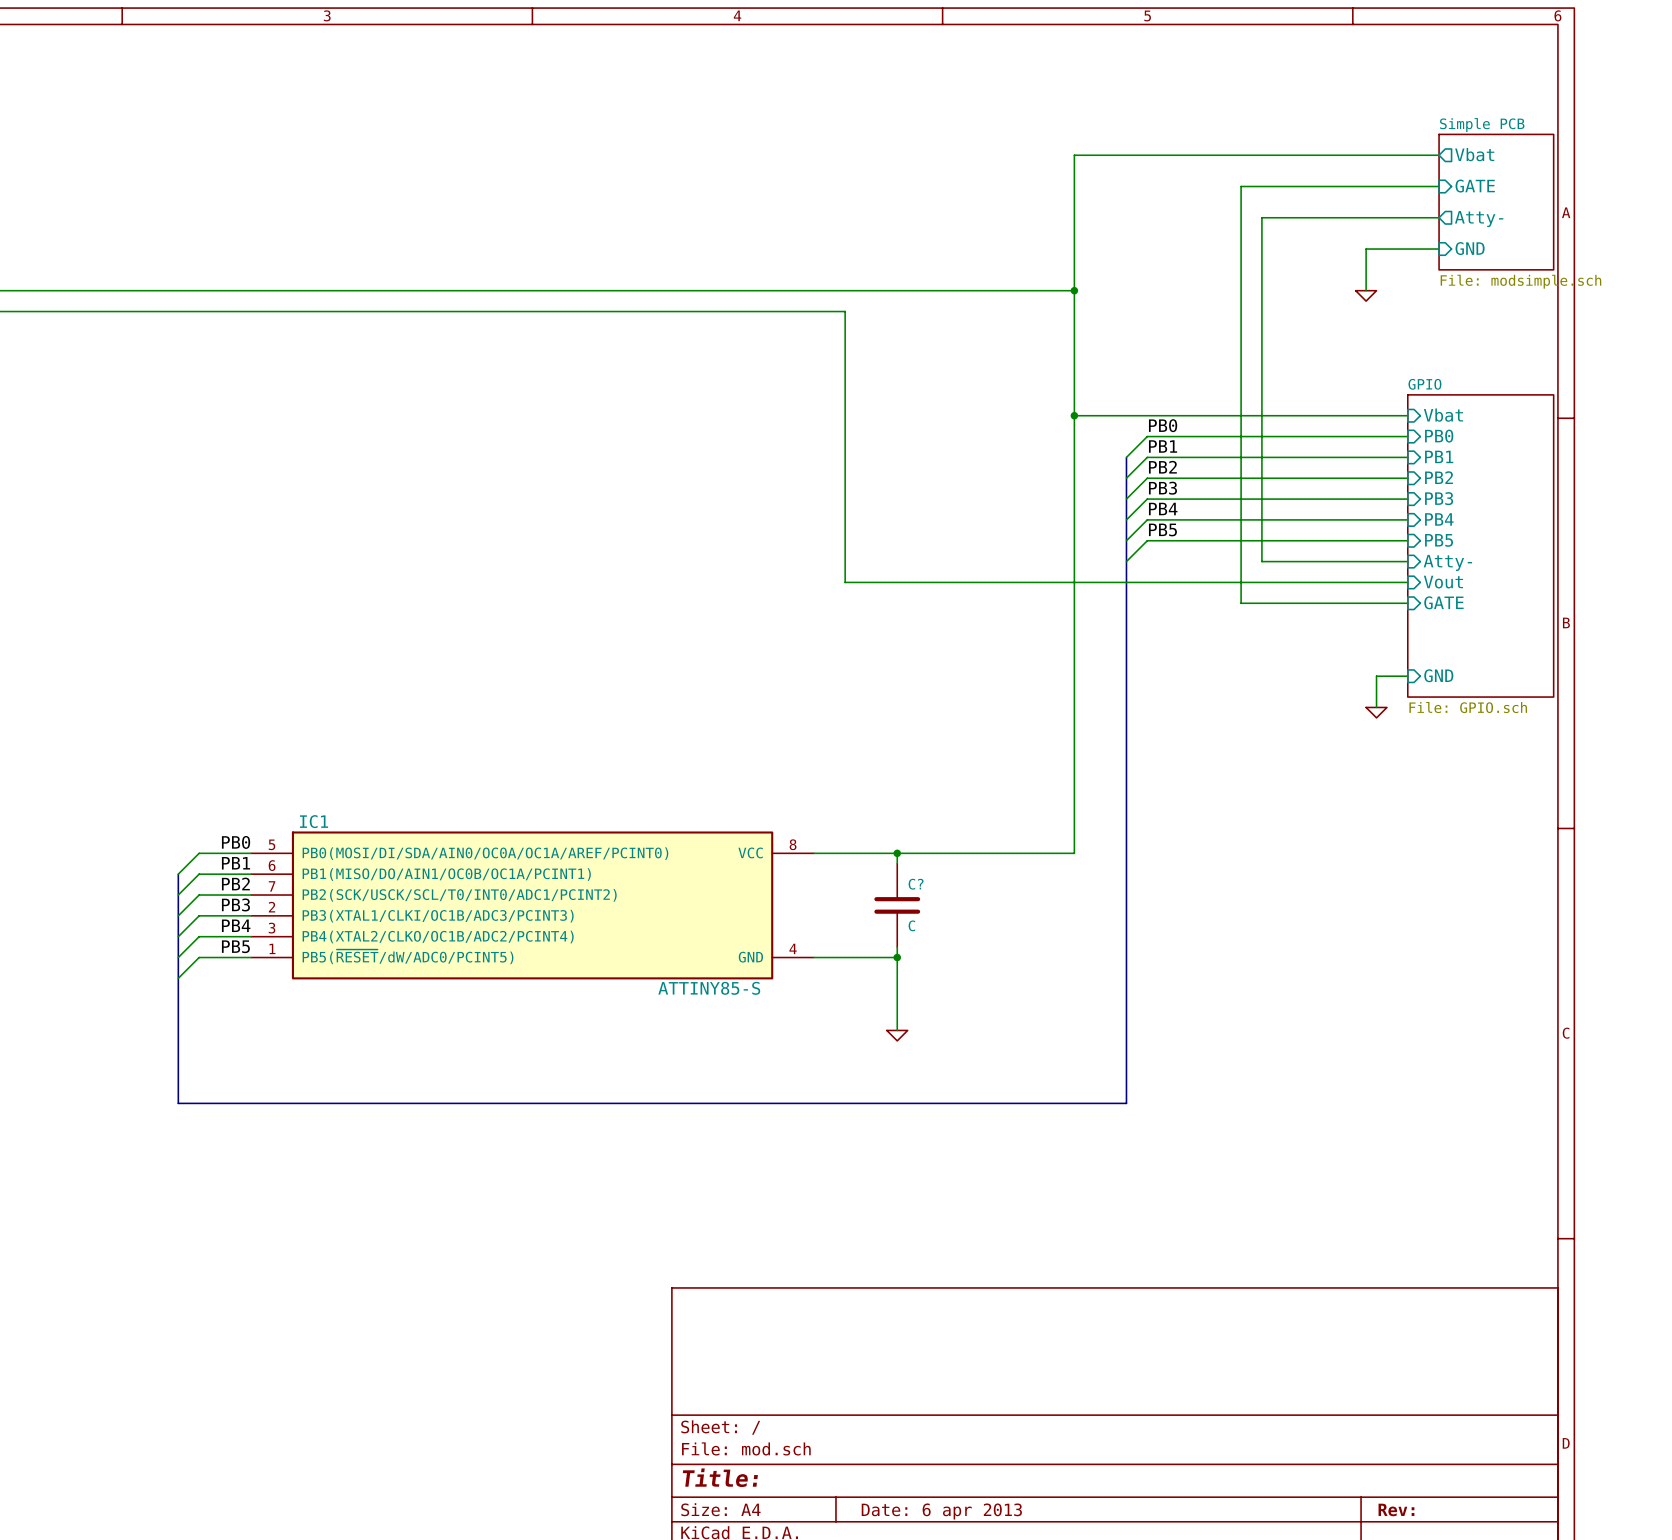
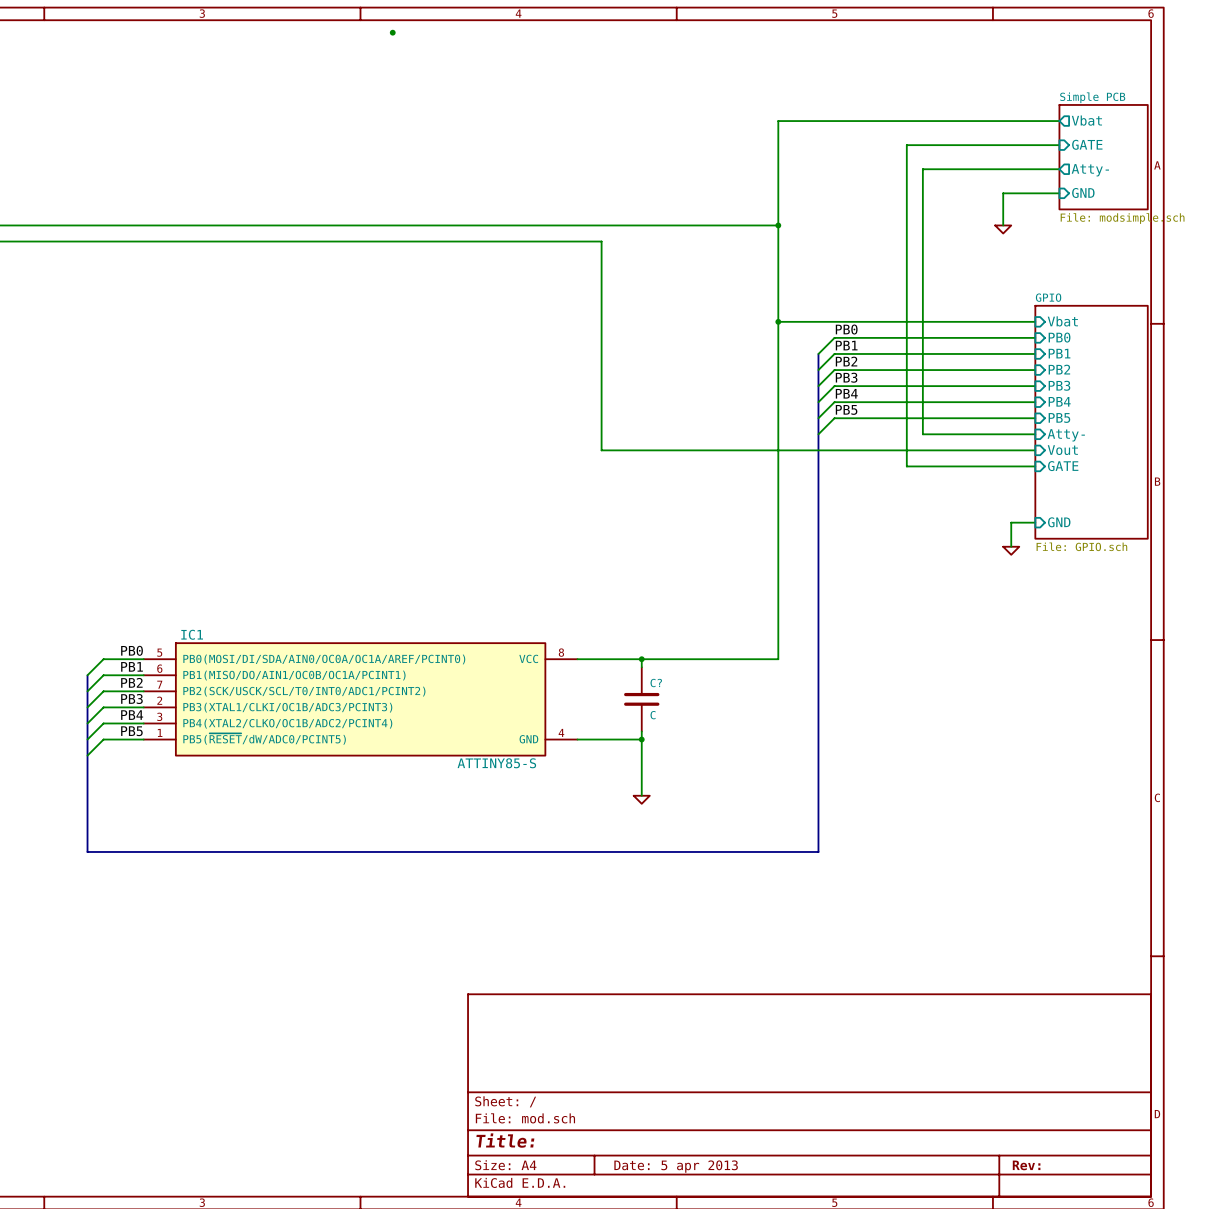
junction: none -> (392, 32)
title block: Date: 6 apr 2013 (941, 1511) -> Date: 5 apr 2013 (676, 1166)

